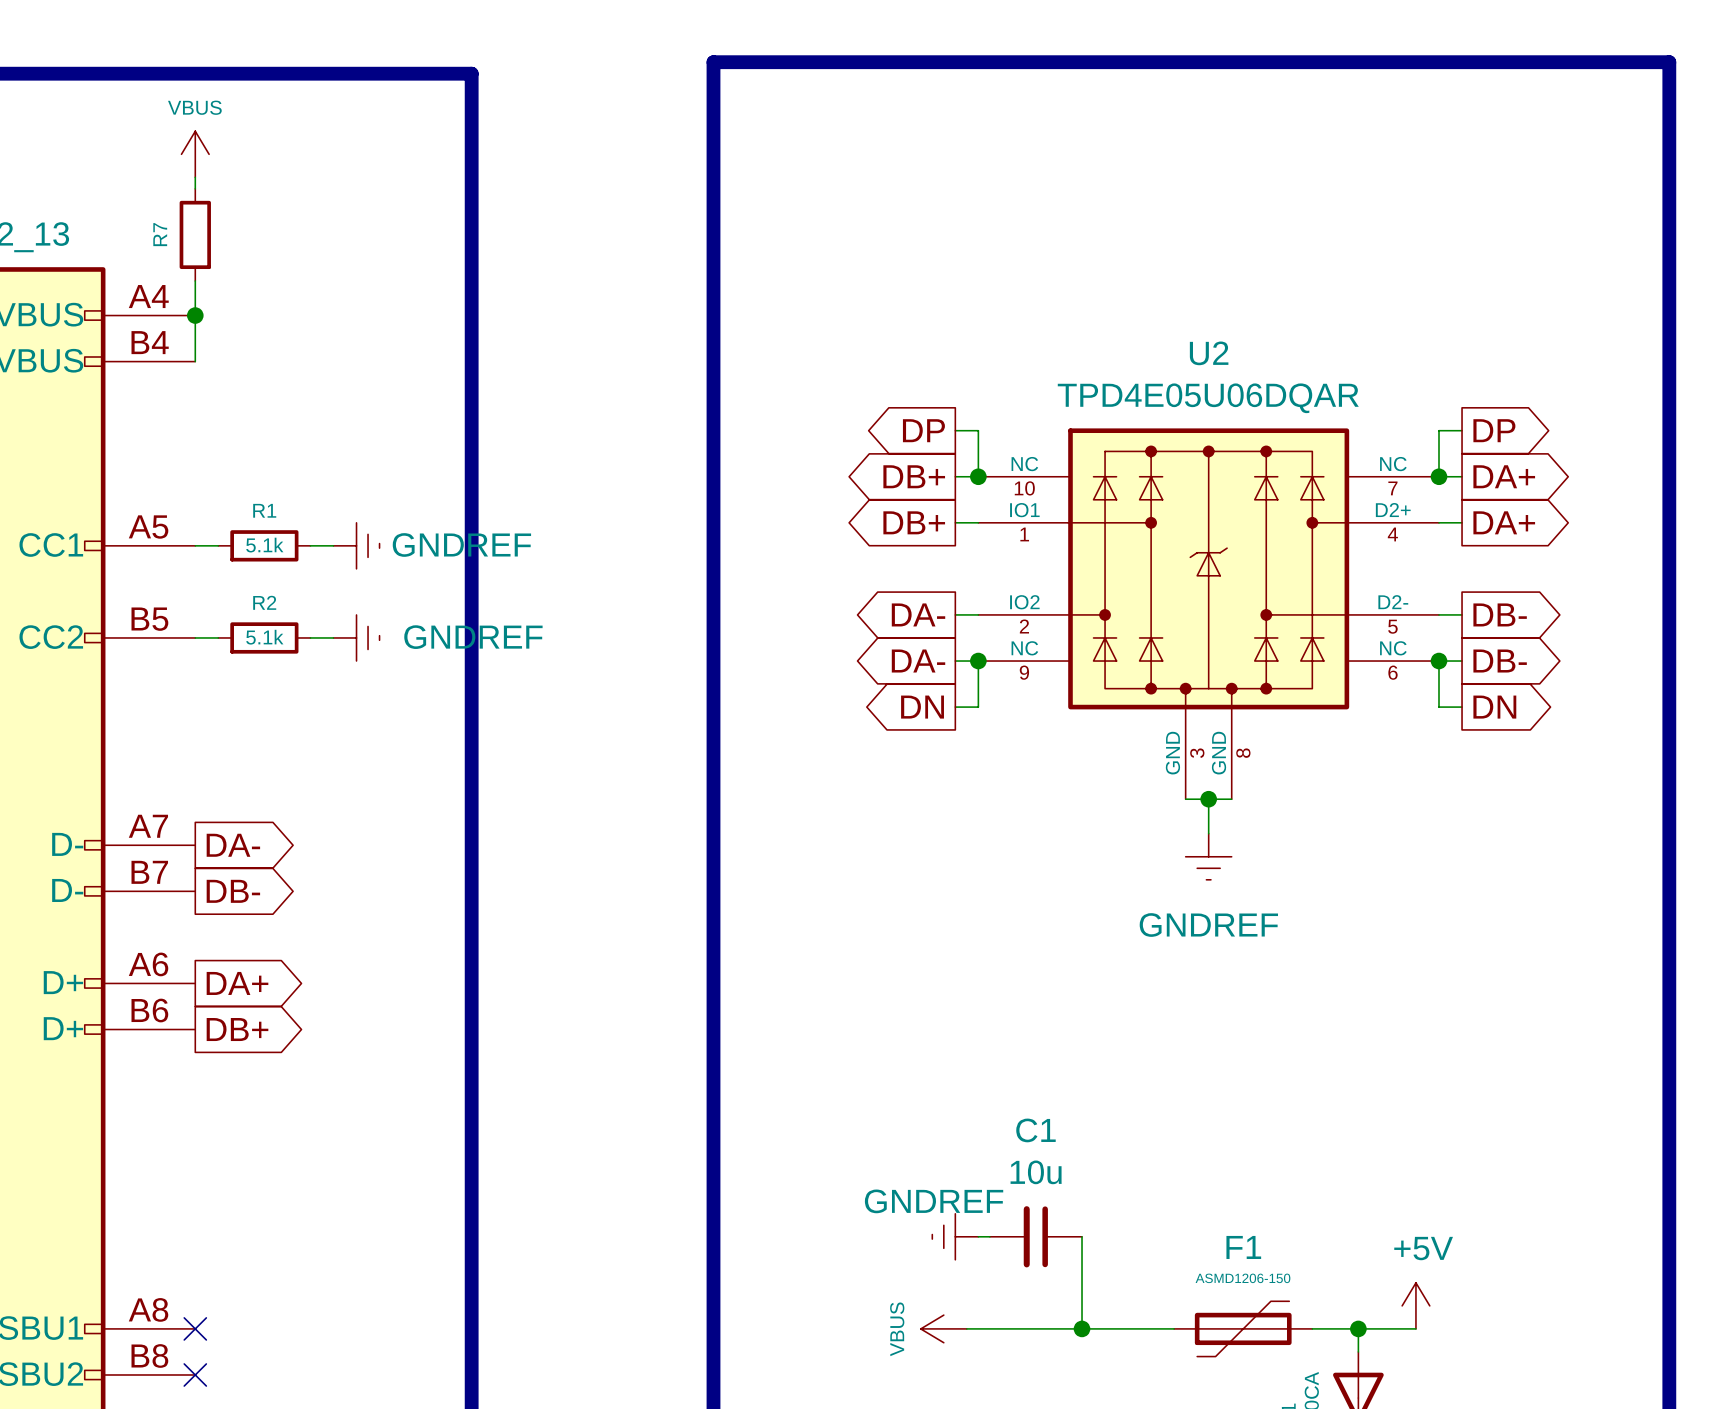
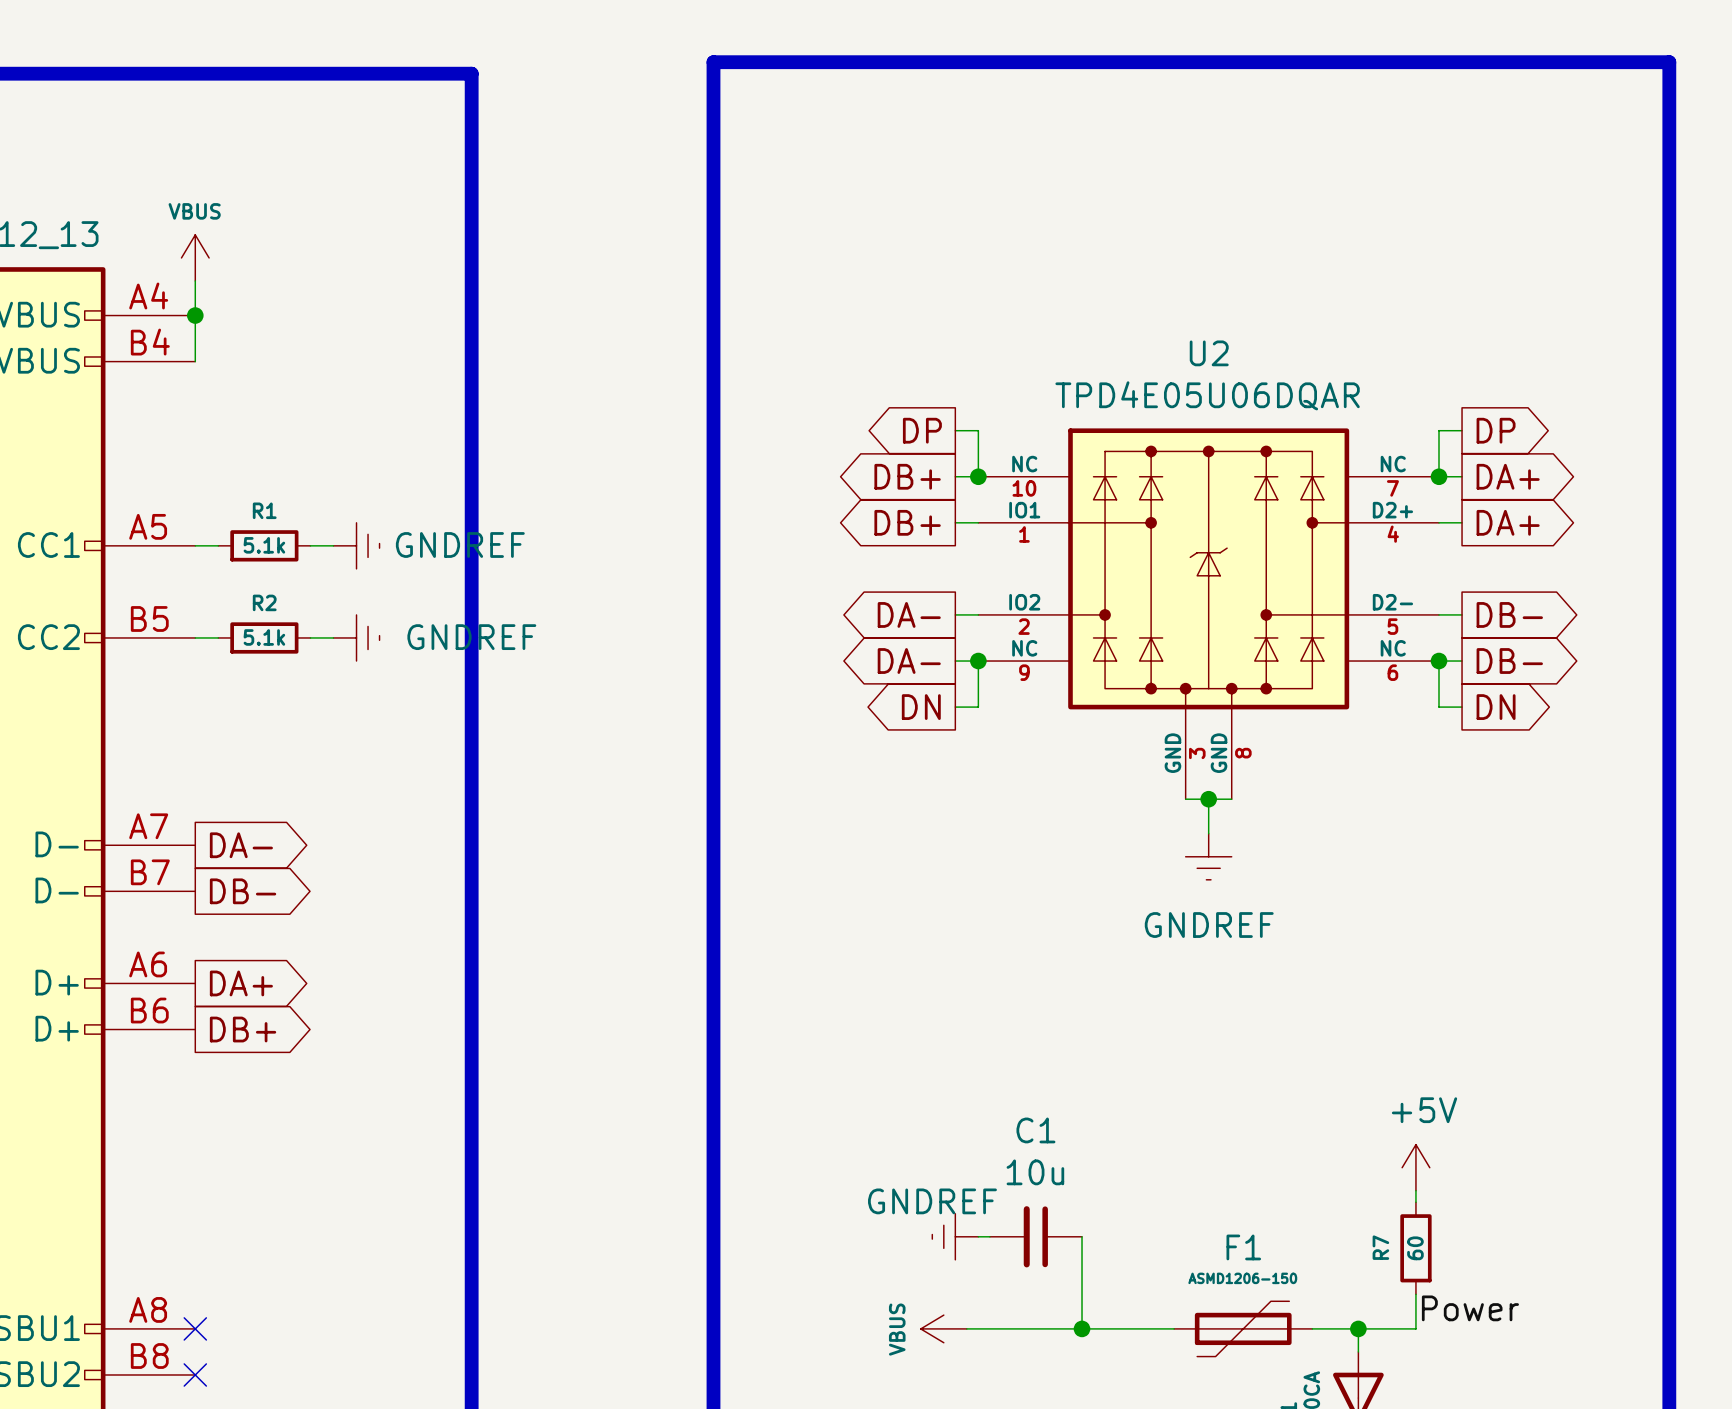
power symbol position: VBUS (195, 154) -> VBUS (195, 257)
wire: (195, 177) (195, 188) -> none
R7 position: (195, 234) -> (1415, 1248)
wire: none -> (1415, 1190) (1415, 1202)
R7 value: none -> 60 (1415, 1248)
power symbol position: +5V (1415, 1305) -> +5V (1415, 1167)
label: none -> Power (1470, 1308)

